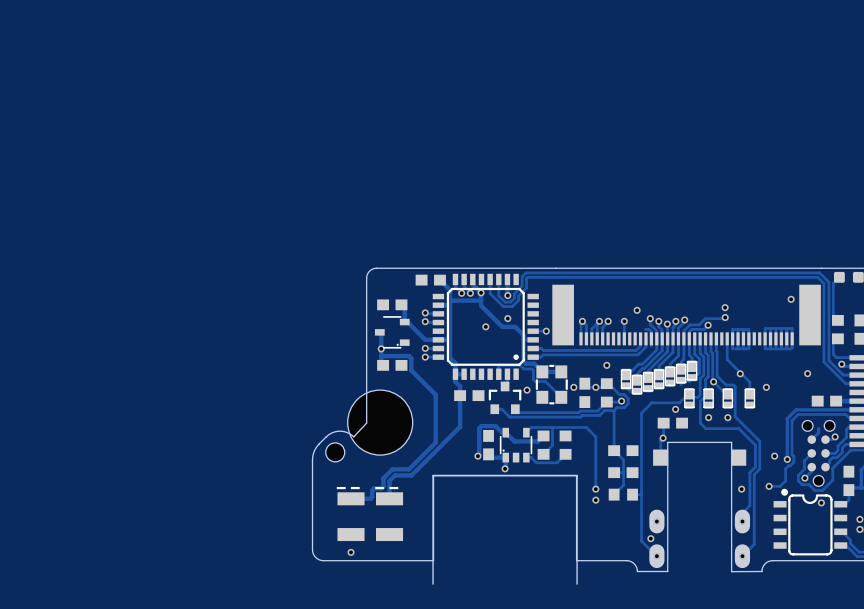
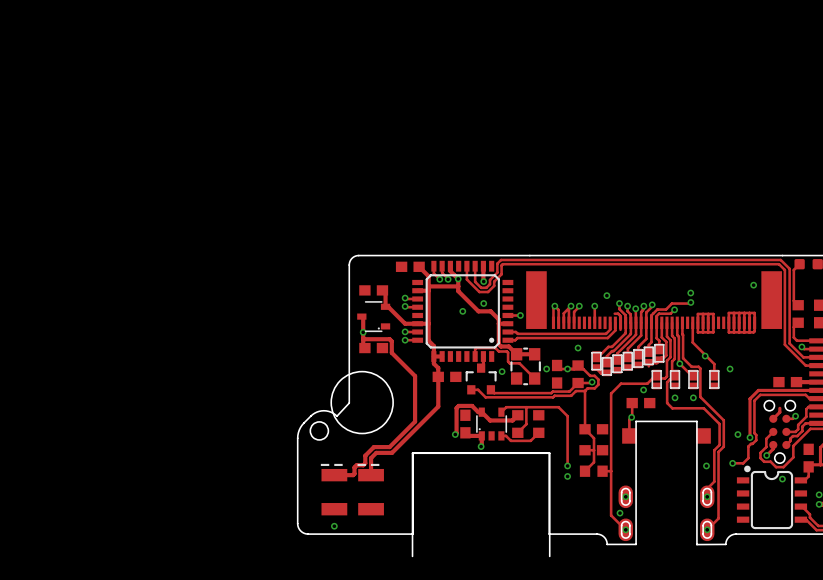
via: (807, 373) -> none

